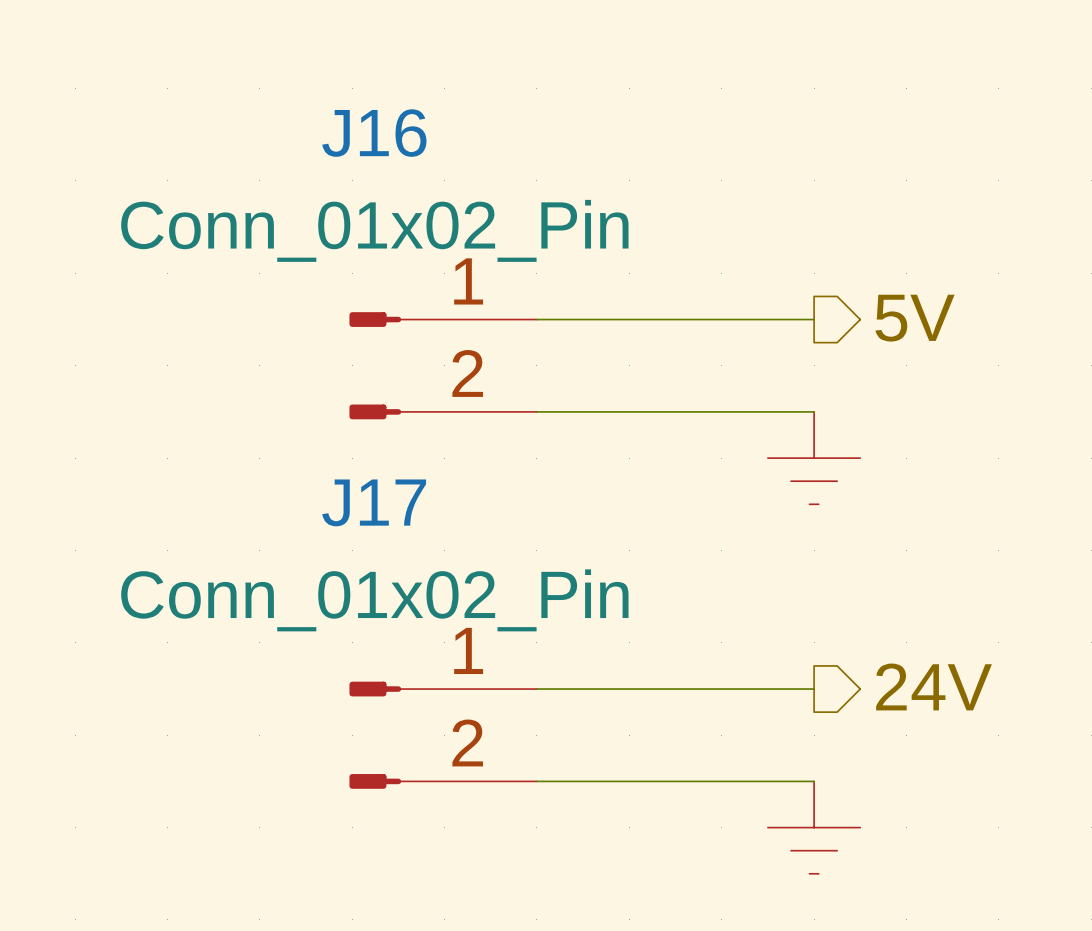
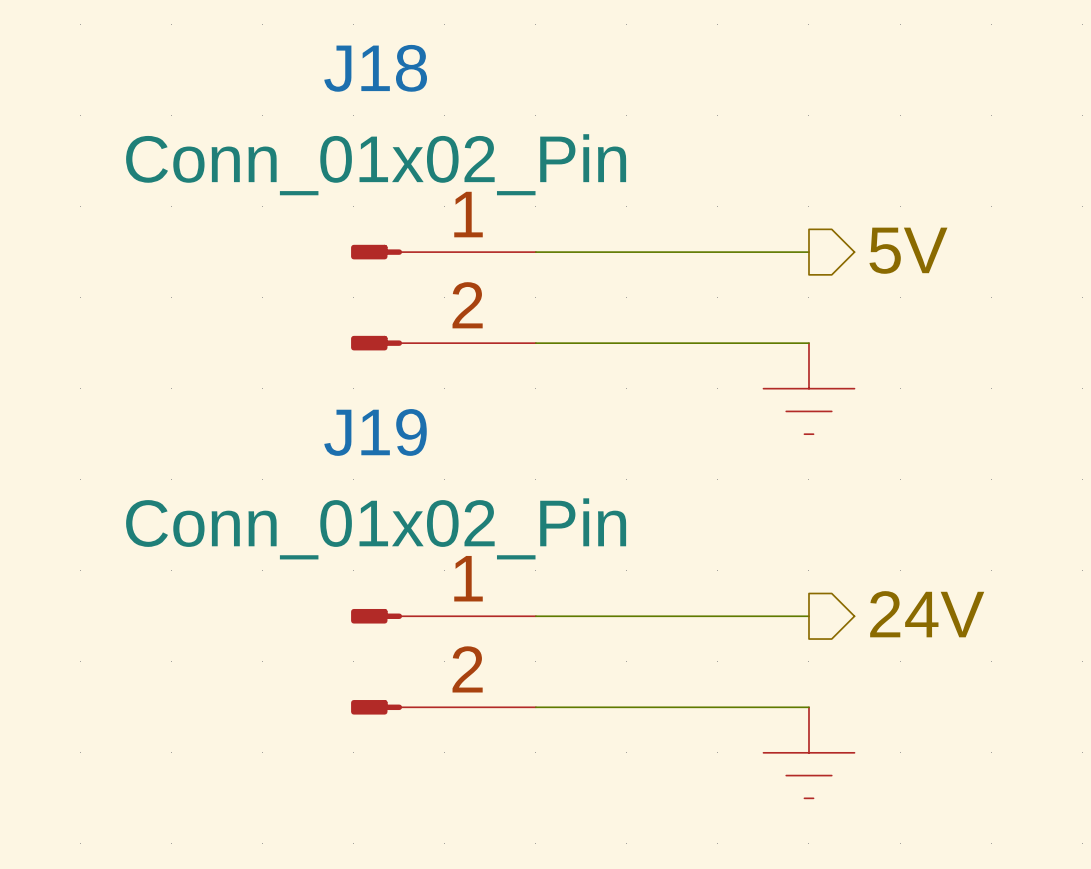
J16 name: J16 (374, 133) -> J18 (375, 68)
J17 name: J17 (374, 502) -> J19 (375, 432)

